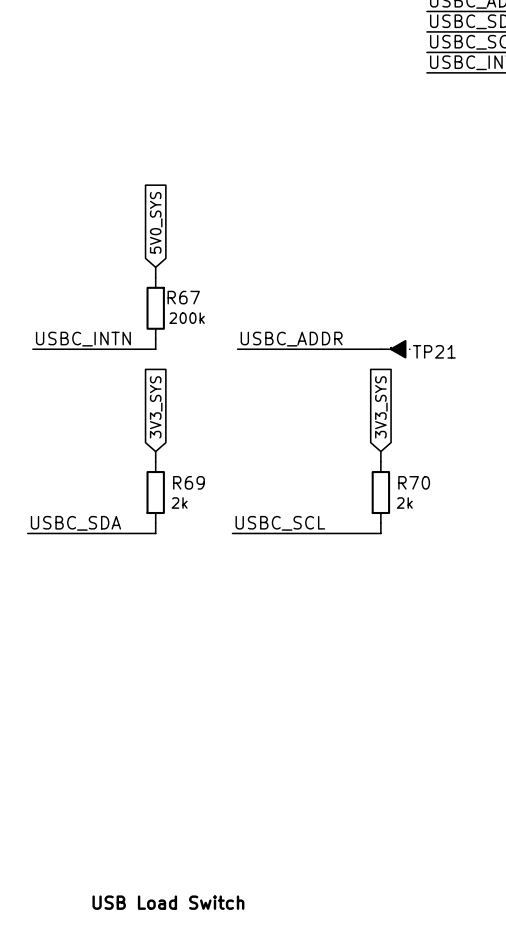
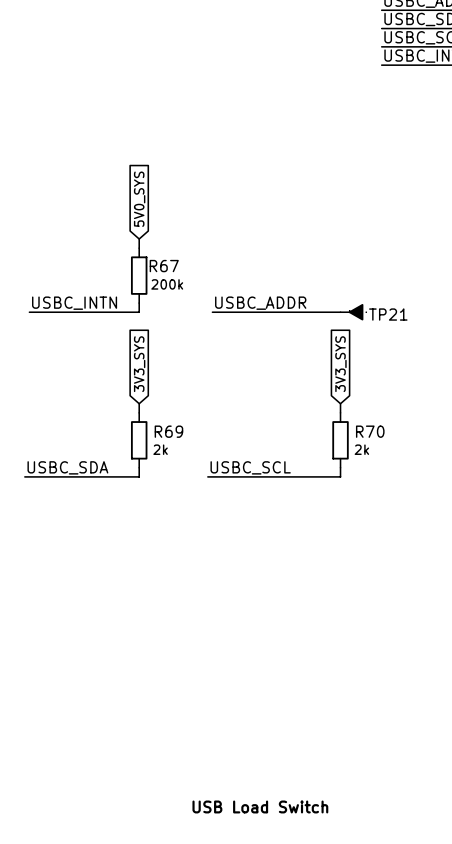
text position: USB Load Switch (168, 902) -> USB Load Switch (260, 806)

